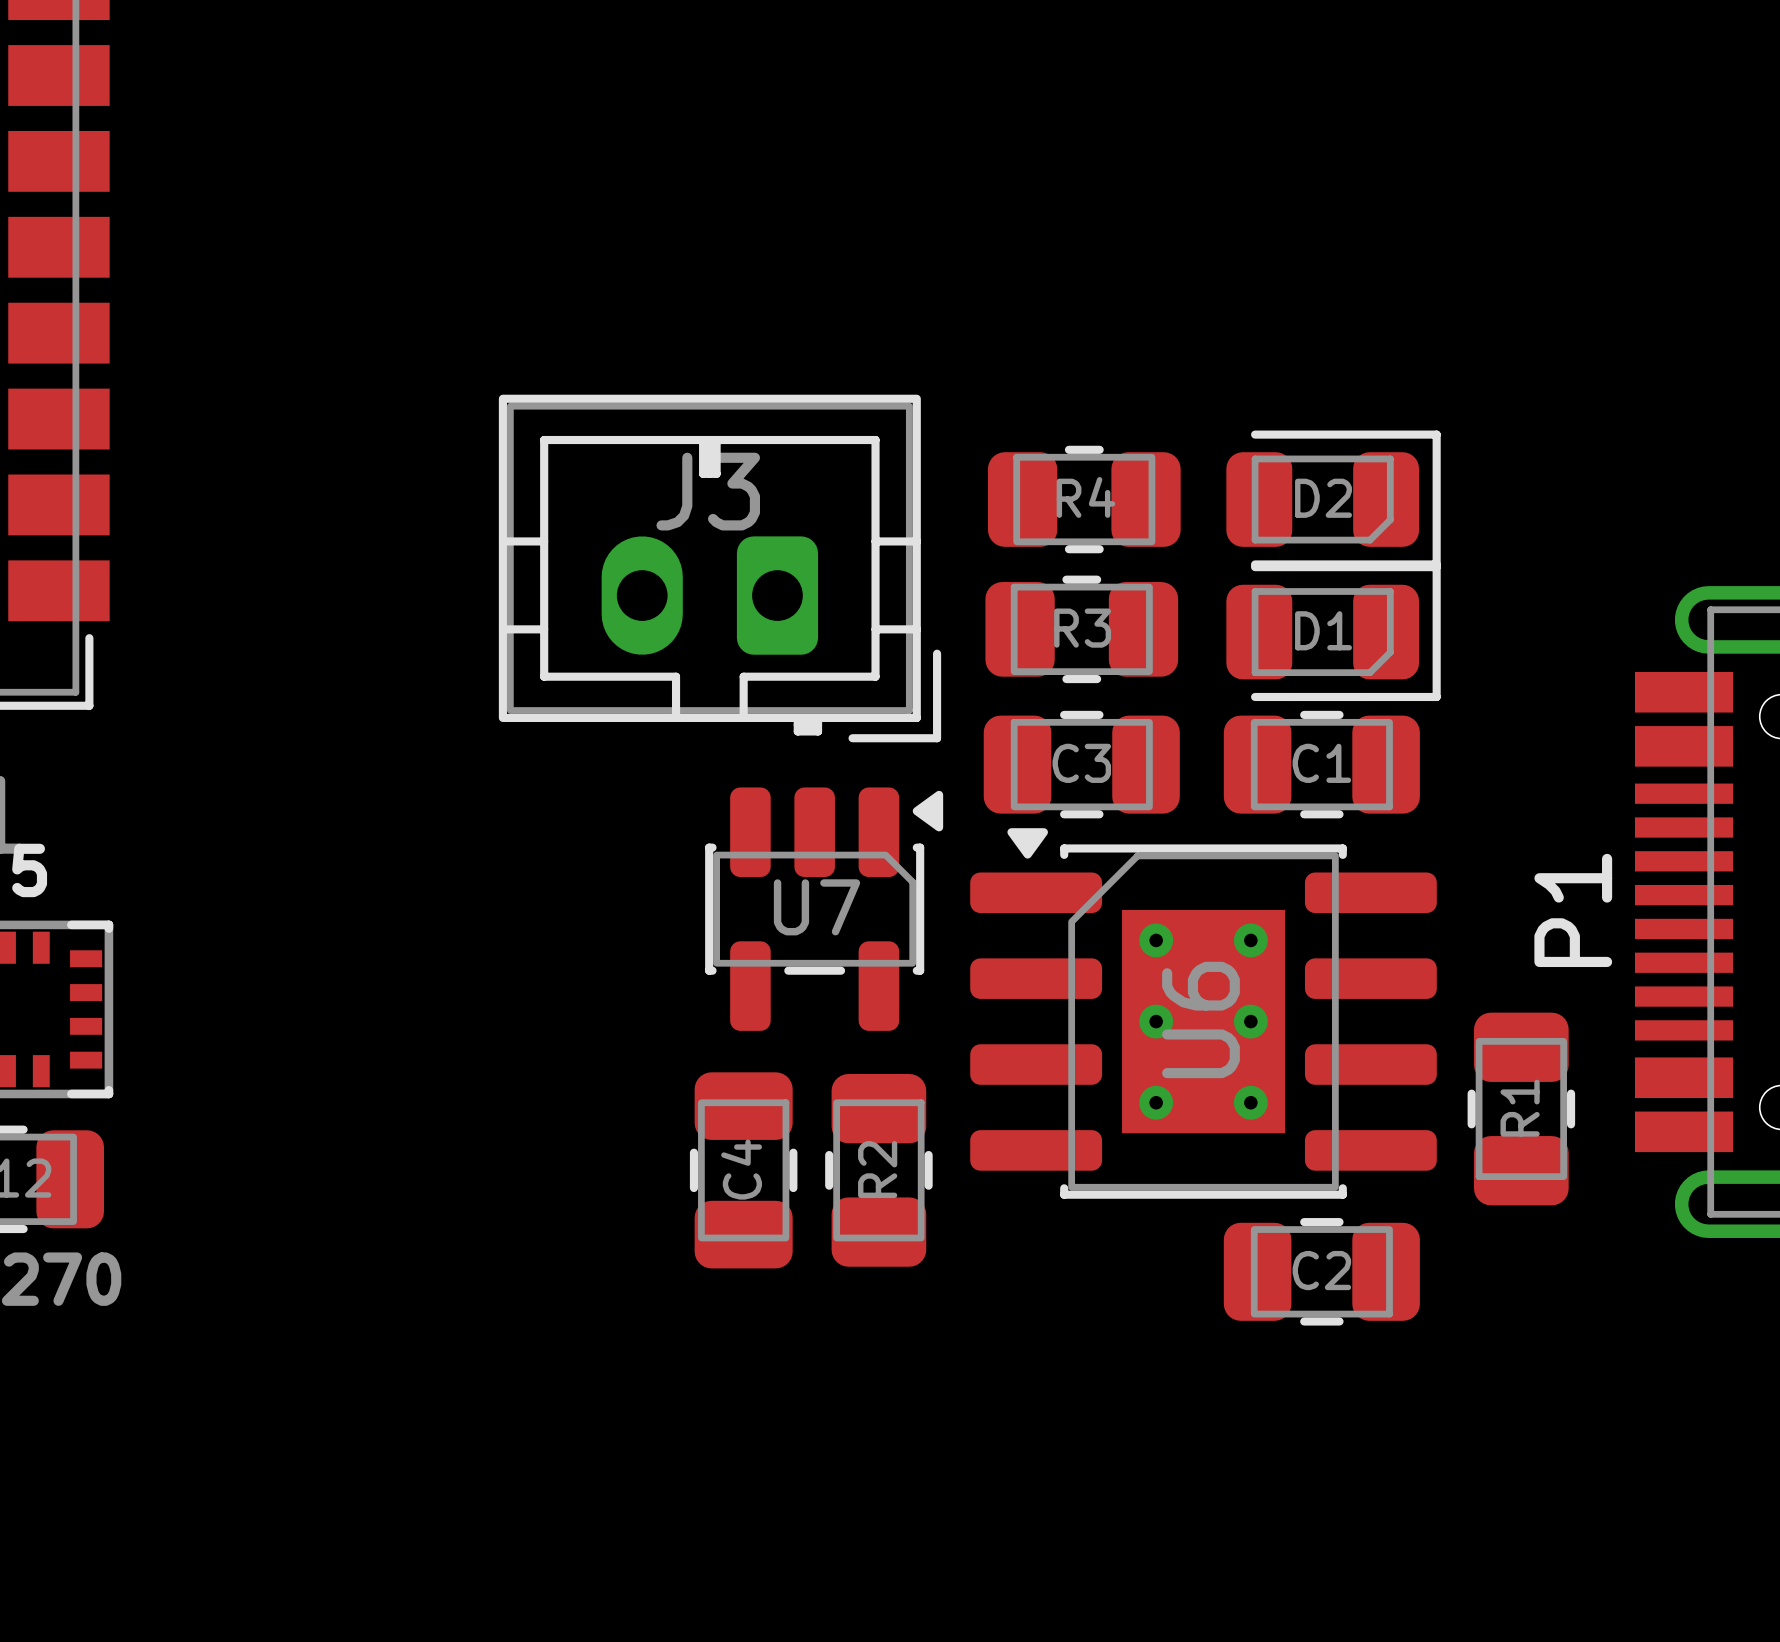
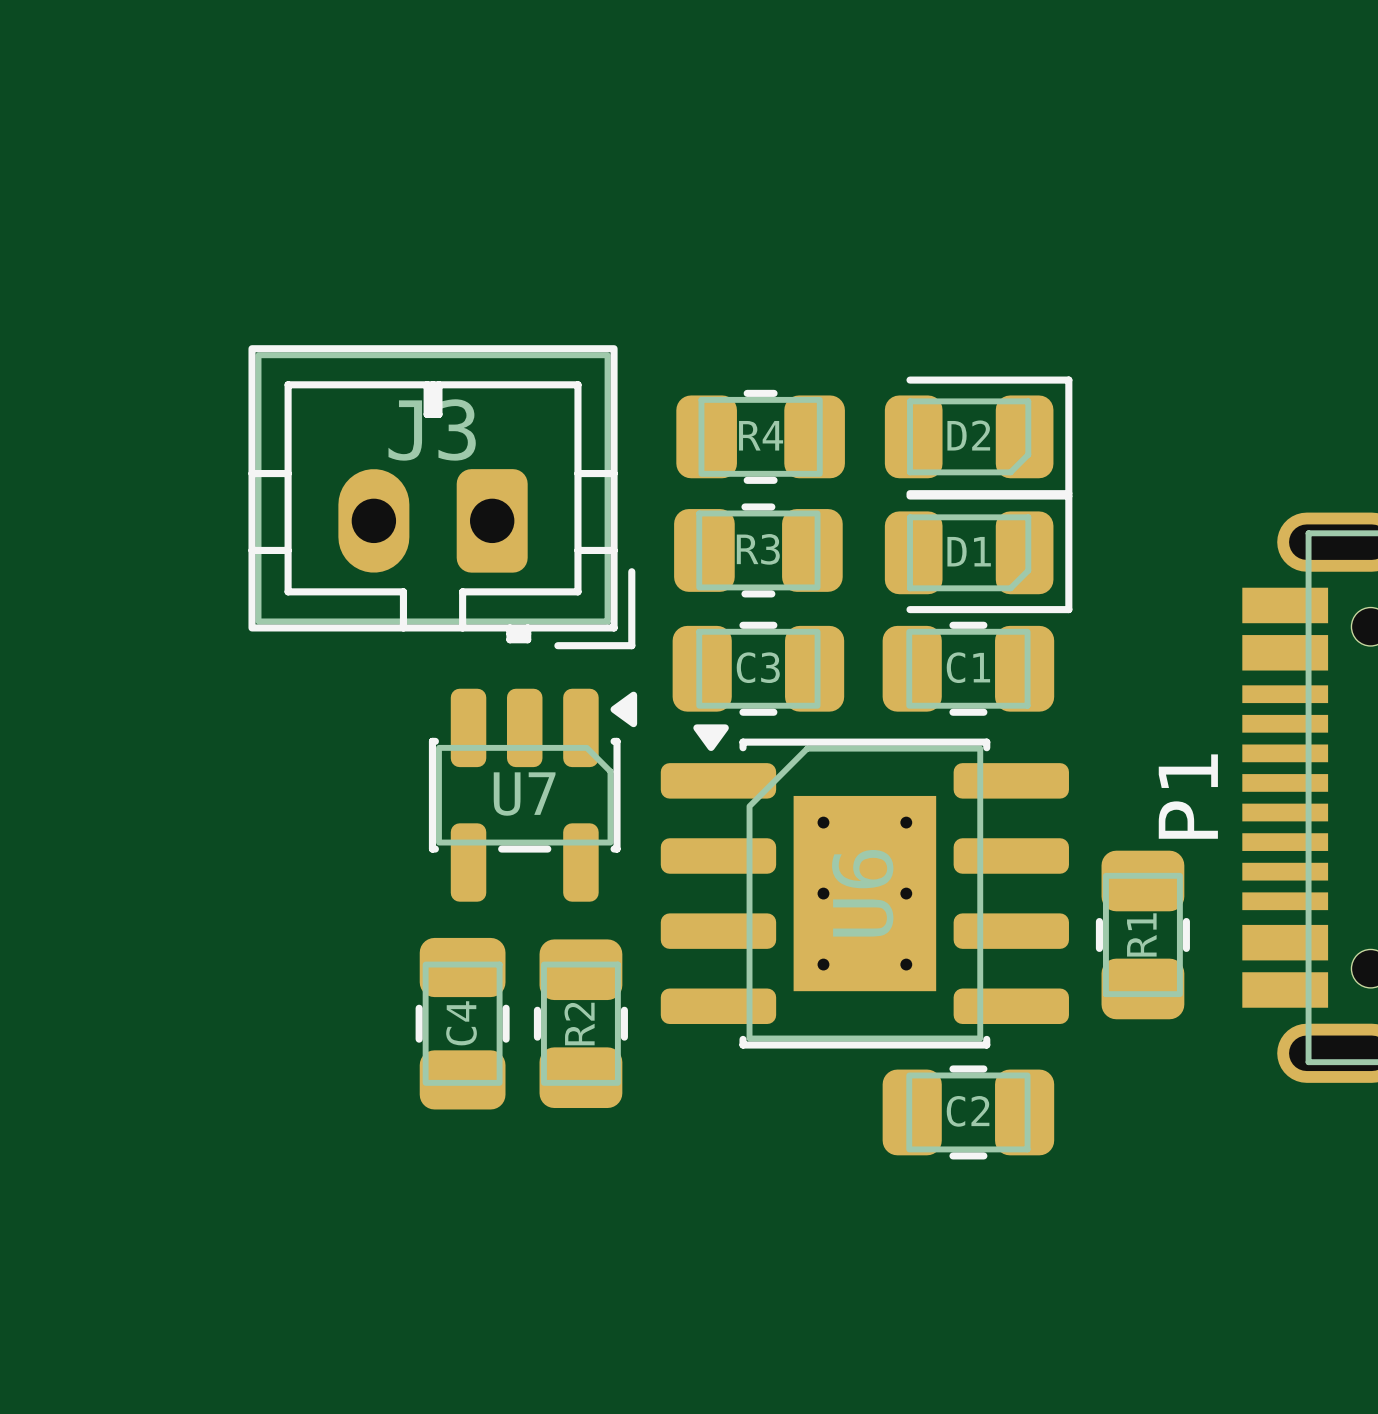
R1 position: (1521, 1108) -> (1142, 934)

